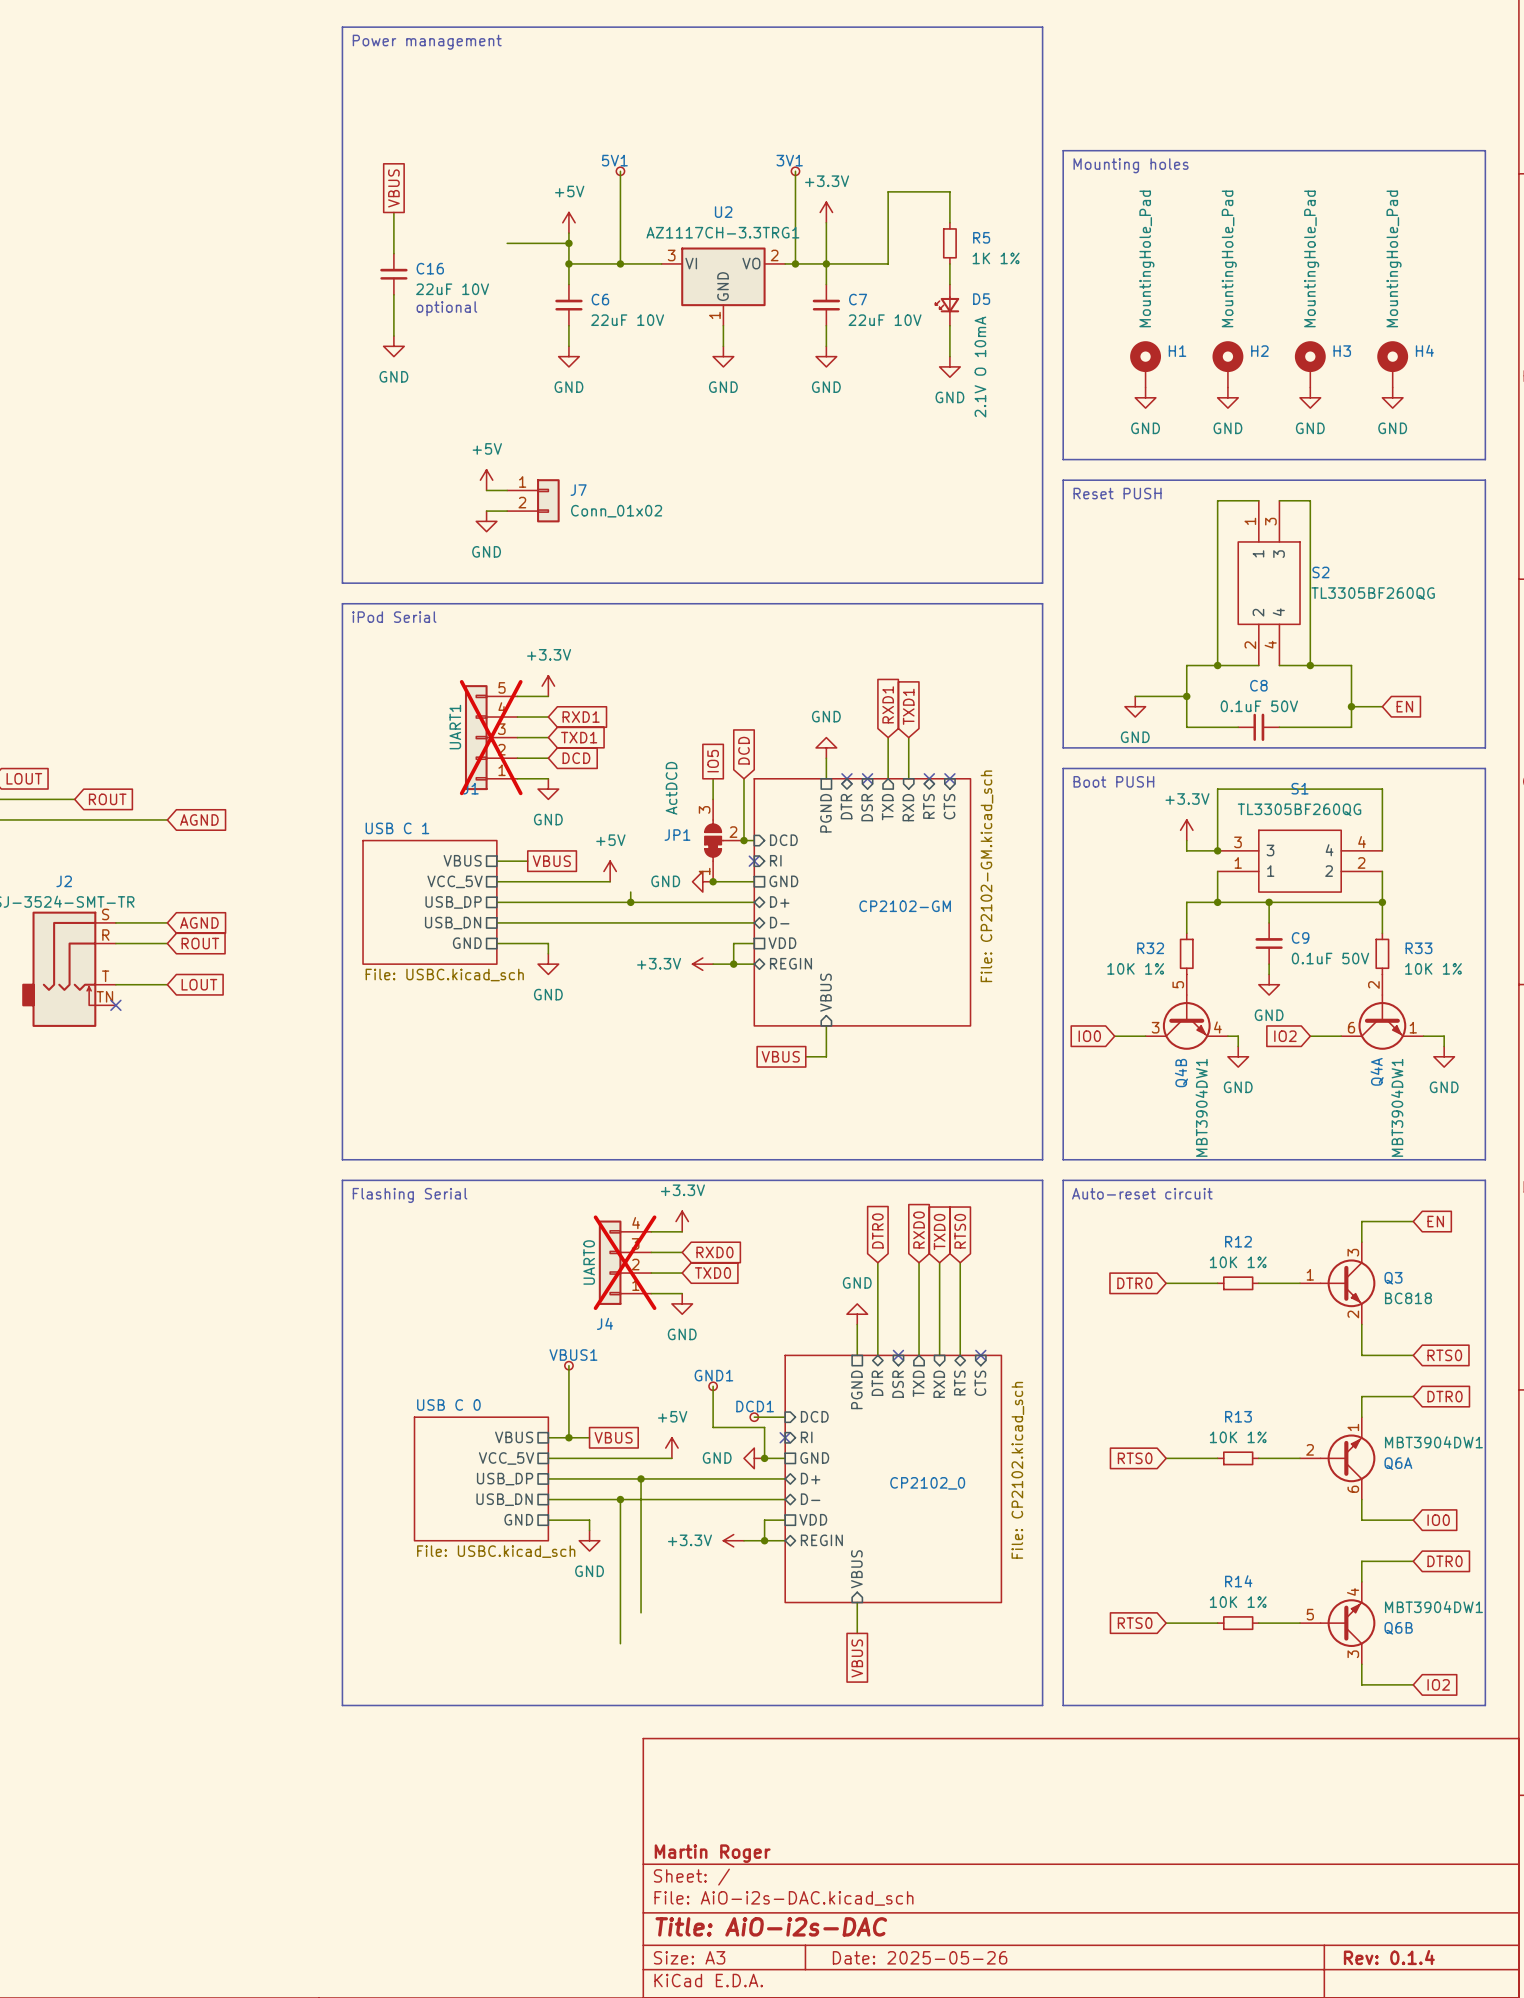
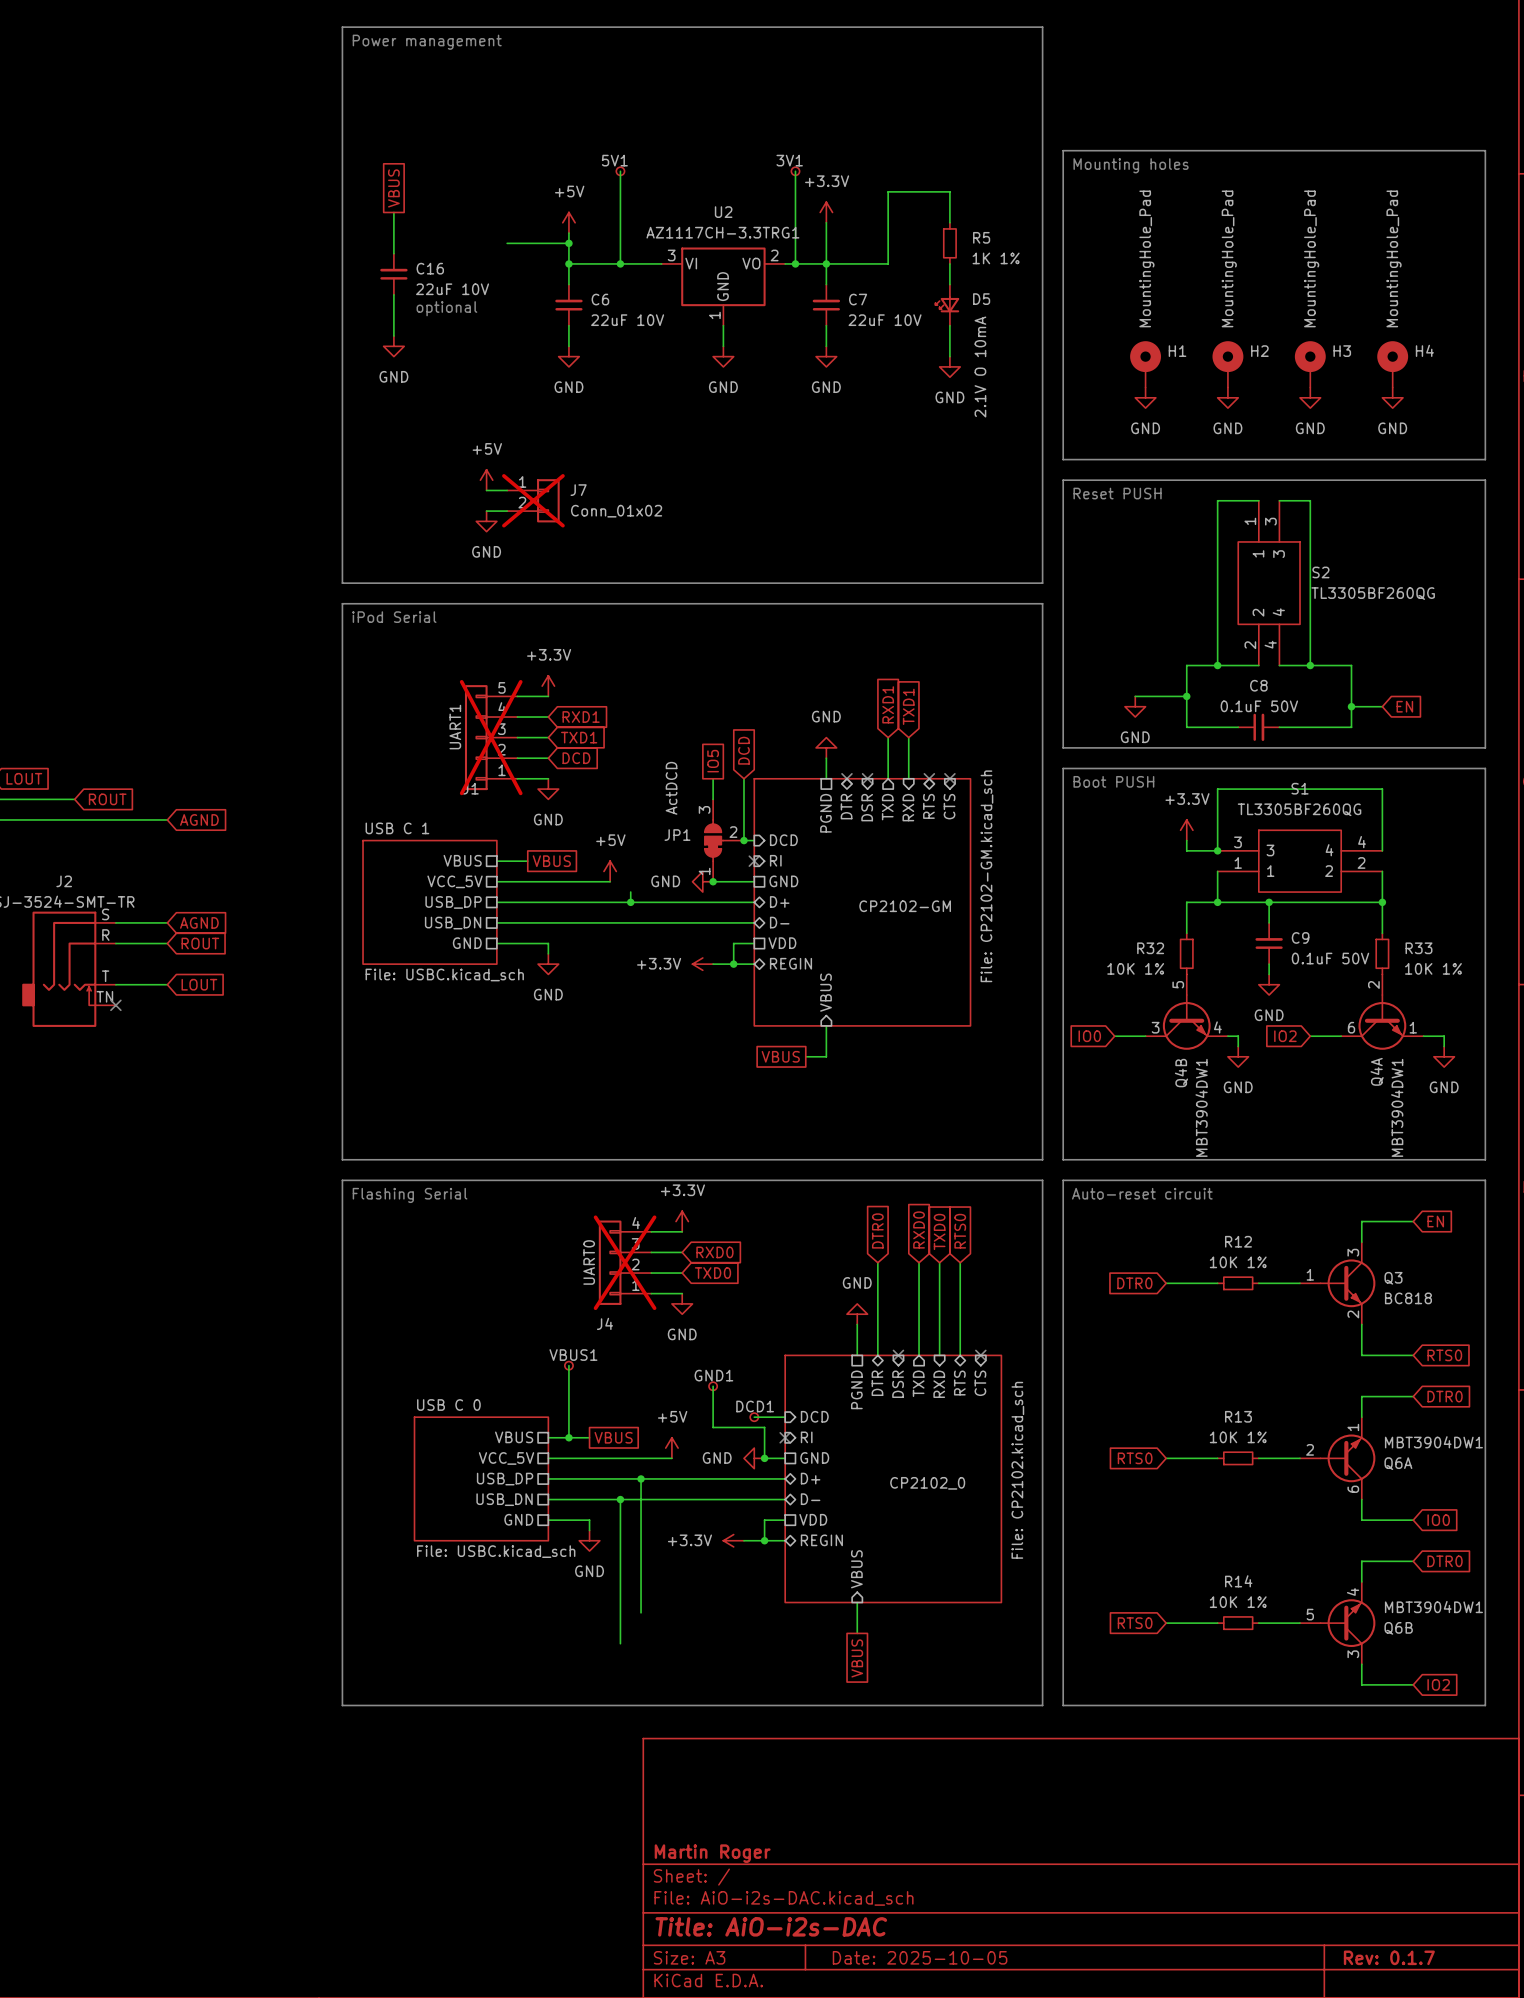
J7 do-not-place cross: none -> (533, 500)
title block: Date: 2025-05-26 (920, 1957) -> Date: 2025-10-05 (920, 1957)
title block: Rev: 0.1.4 (1389, 1957) -> Rev: 0.1.7 (1389, 1957)

